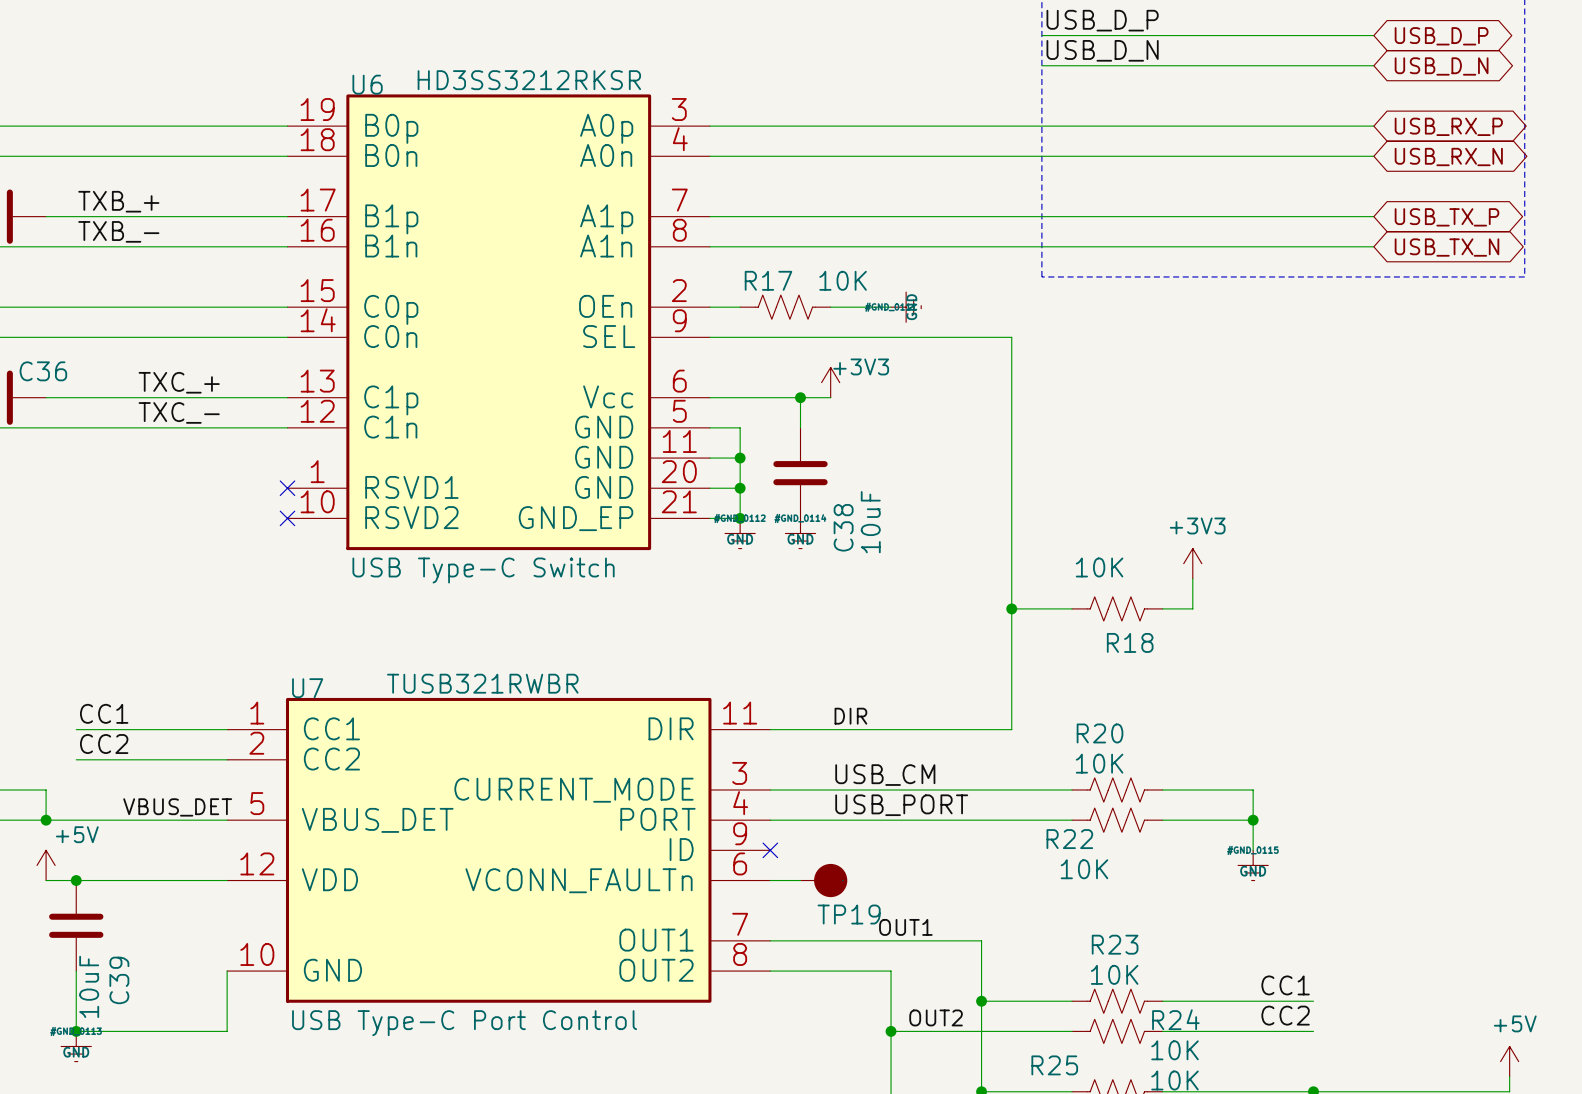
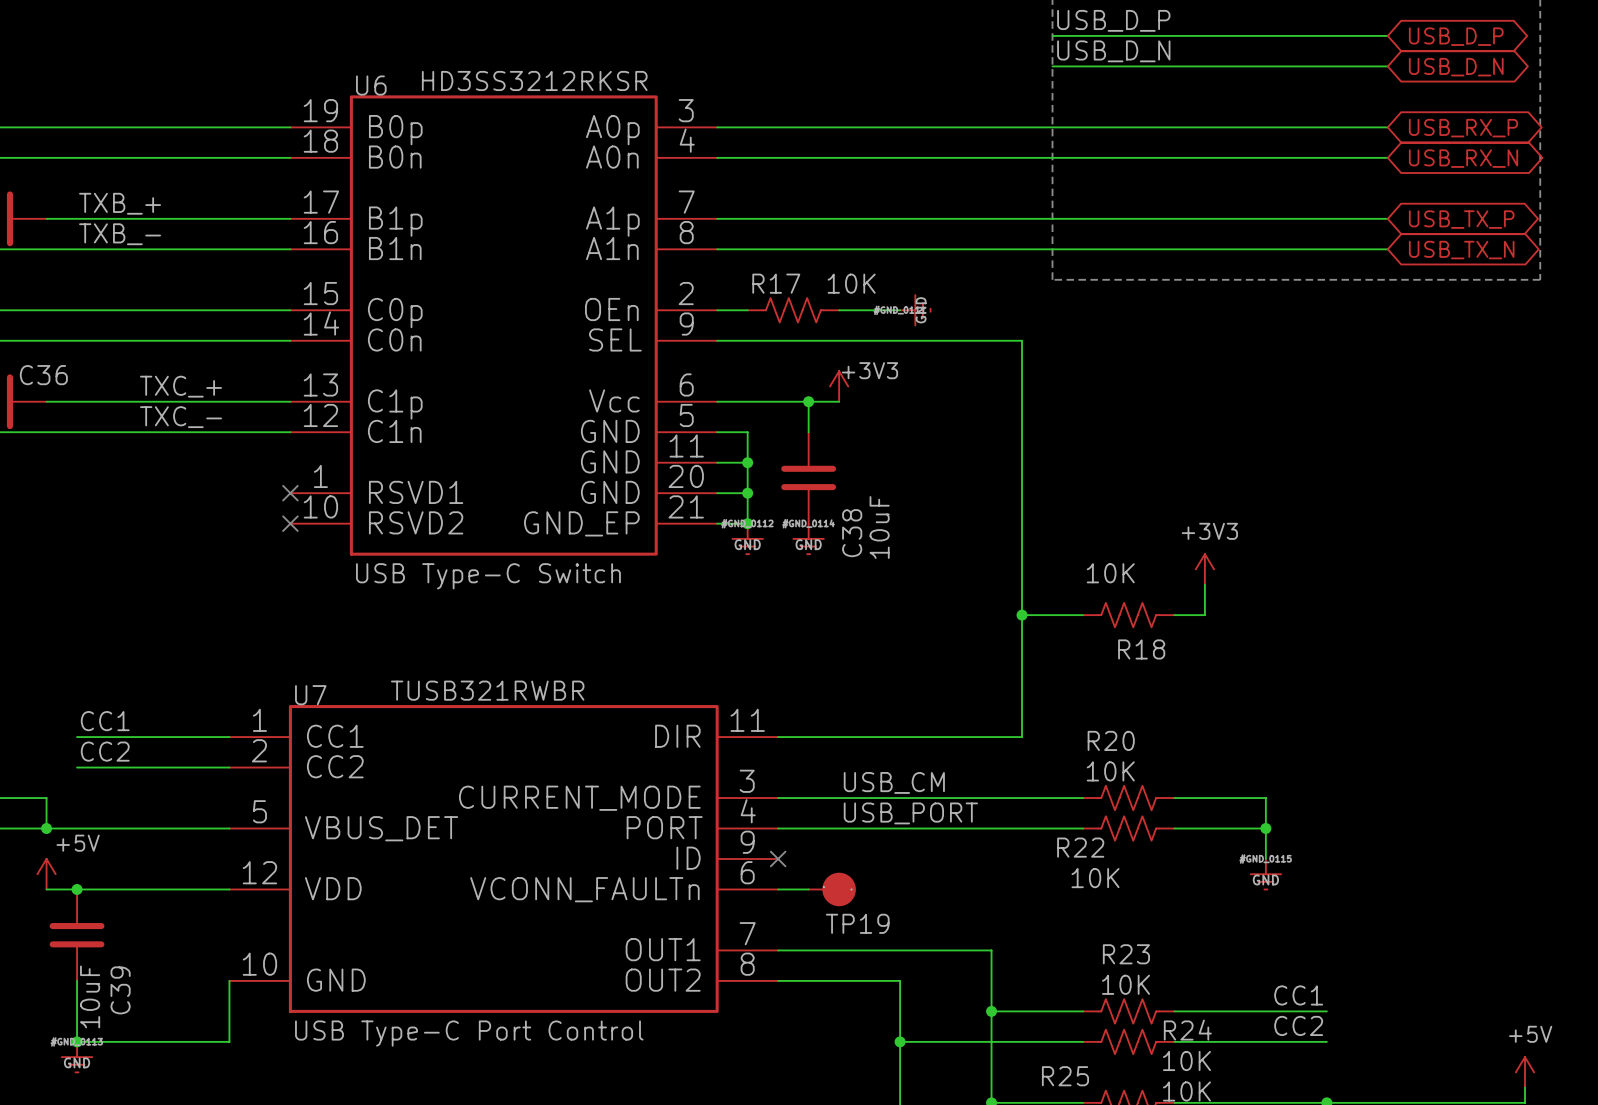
label: DIR (850, 716) -> none
label: VBUS_DET (177, 807) -> none
label: OUT1 (905, 927) -> none
label: OUT2 (936, 1017) -> none

